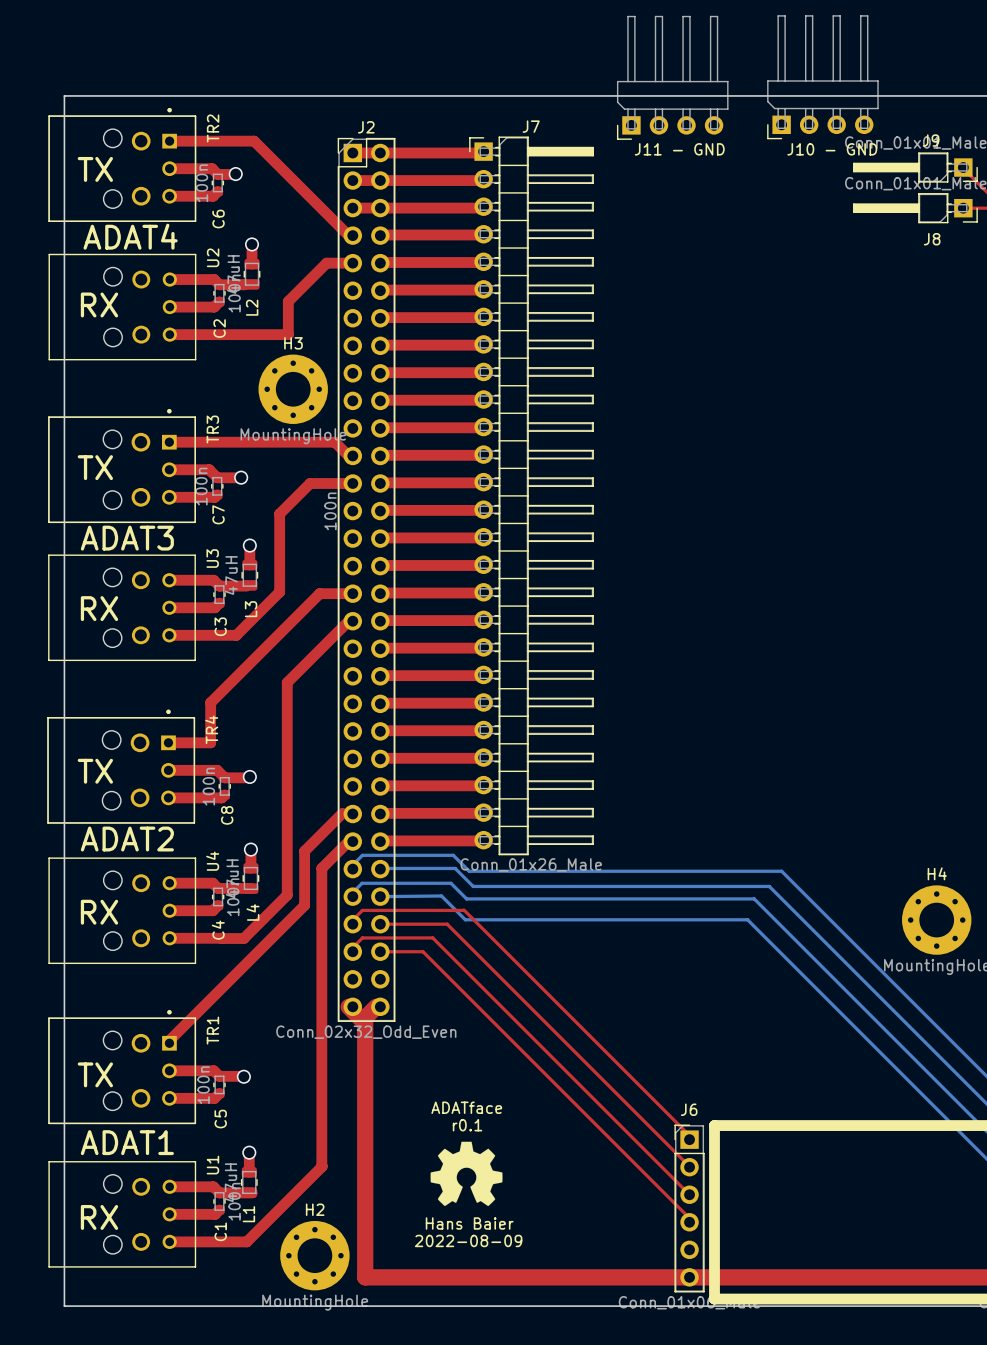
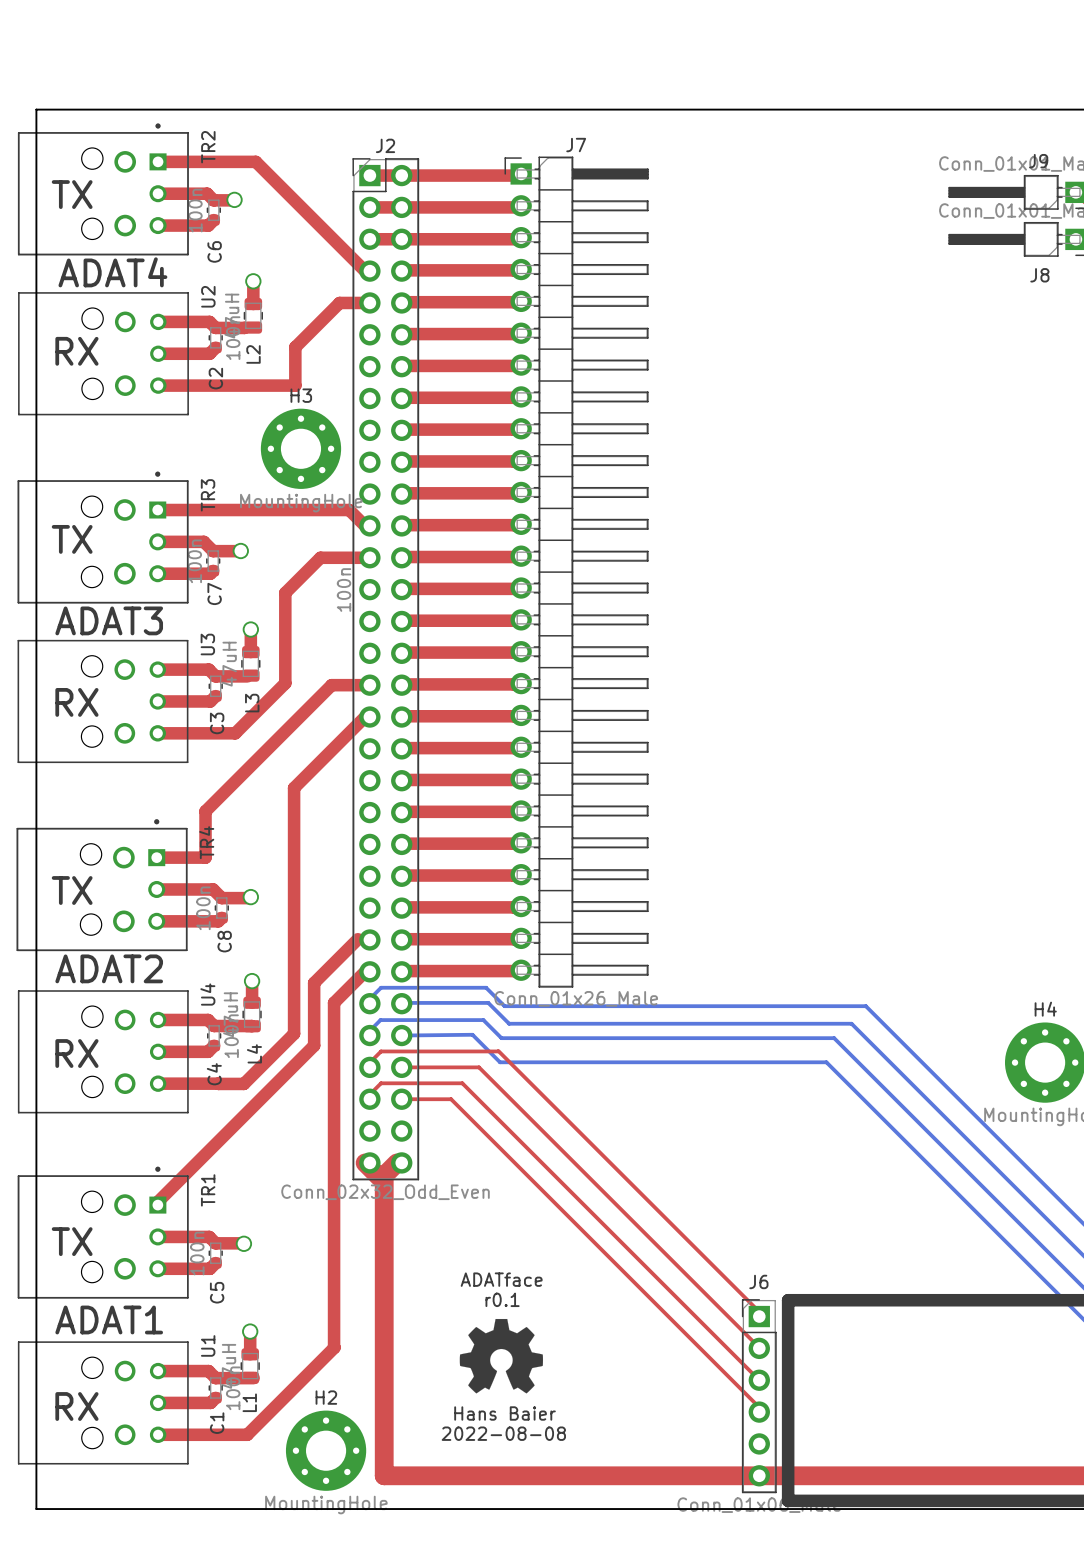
J11 - GND: (672, 77) -> none
J10 - GND: (822, 77) -> none
text: 2022-08-09 (468, 1240) -> 2022-08-08 (503, 1433)

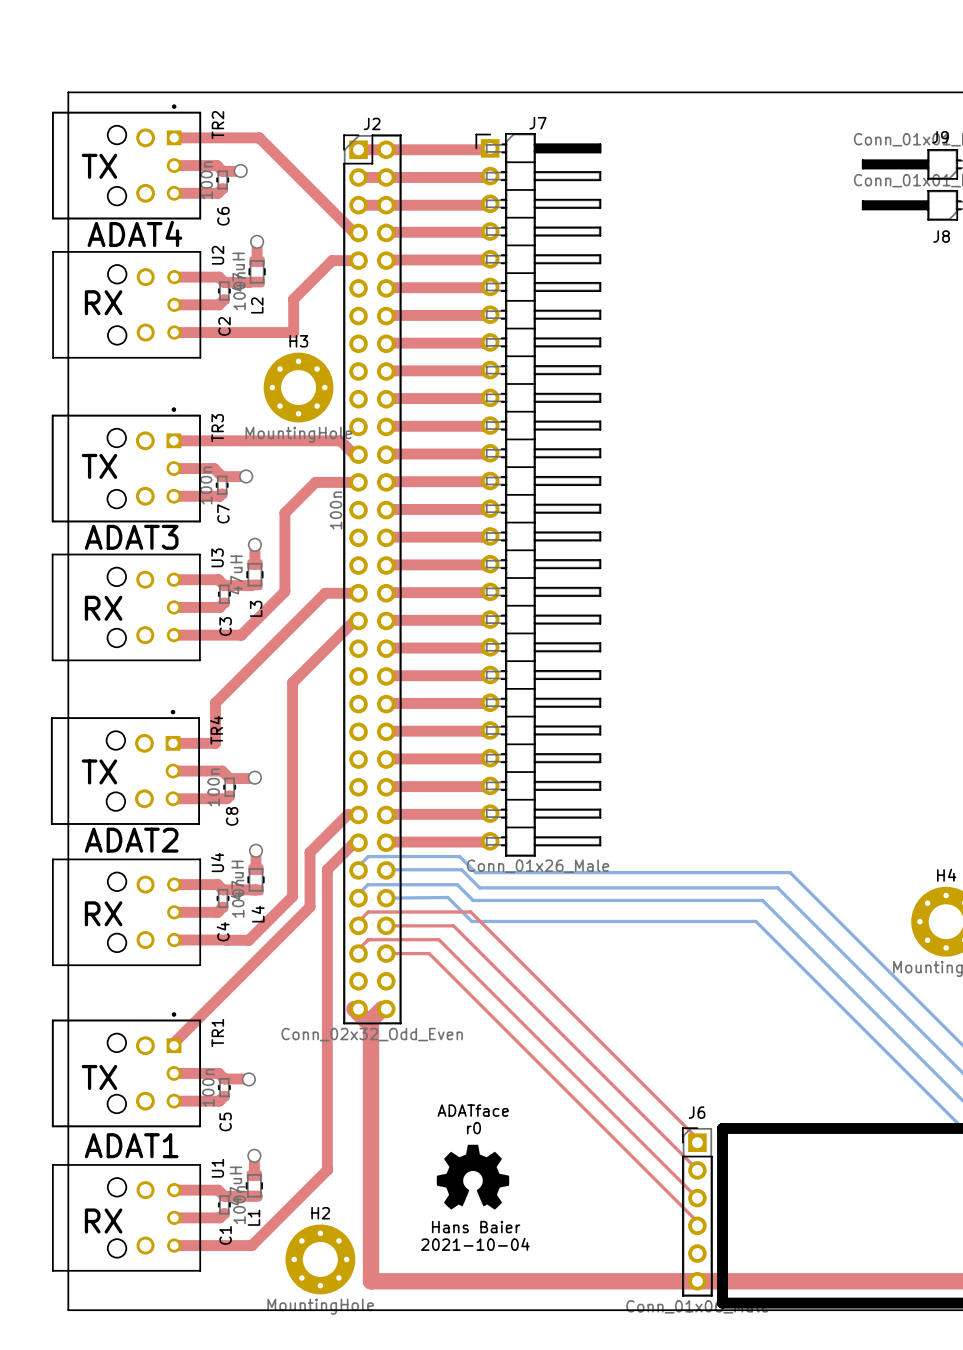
text: r0.1 (502, 1299) -> r0 (473, 1128)
text: 2022-08-08 (503, 1433) -> 2021-10-04 (475, 1244)

